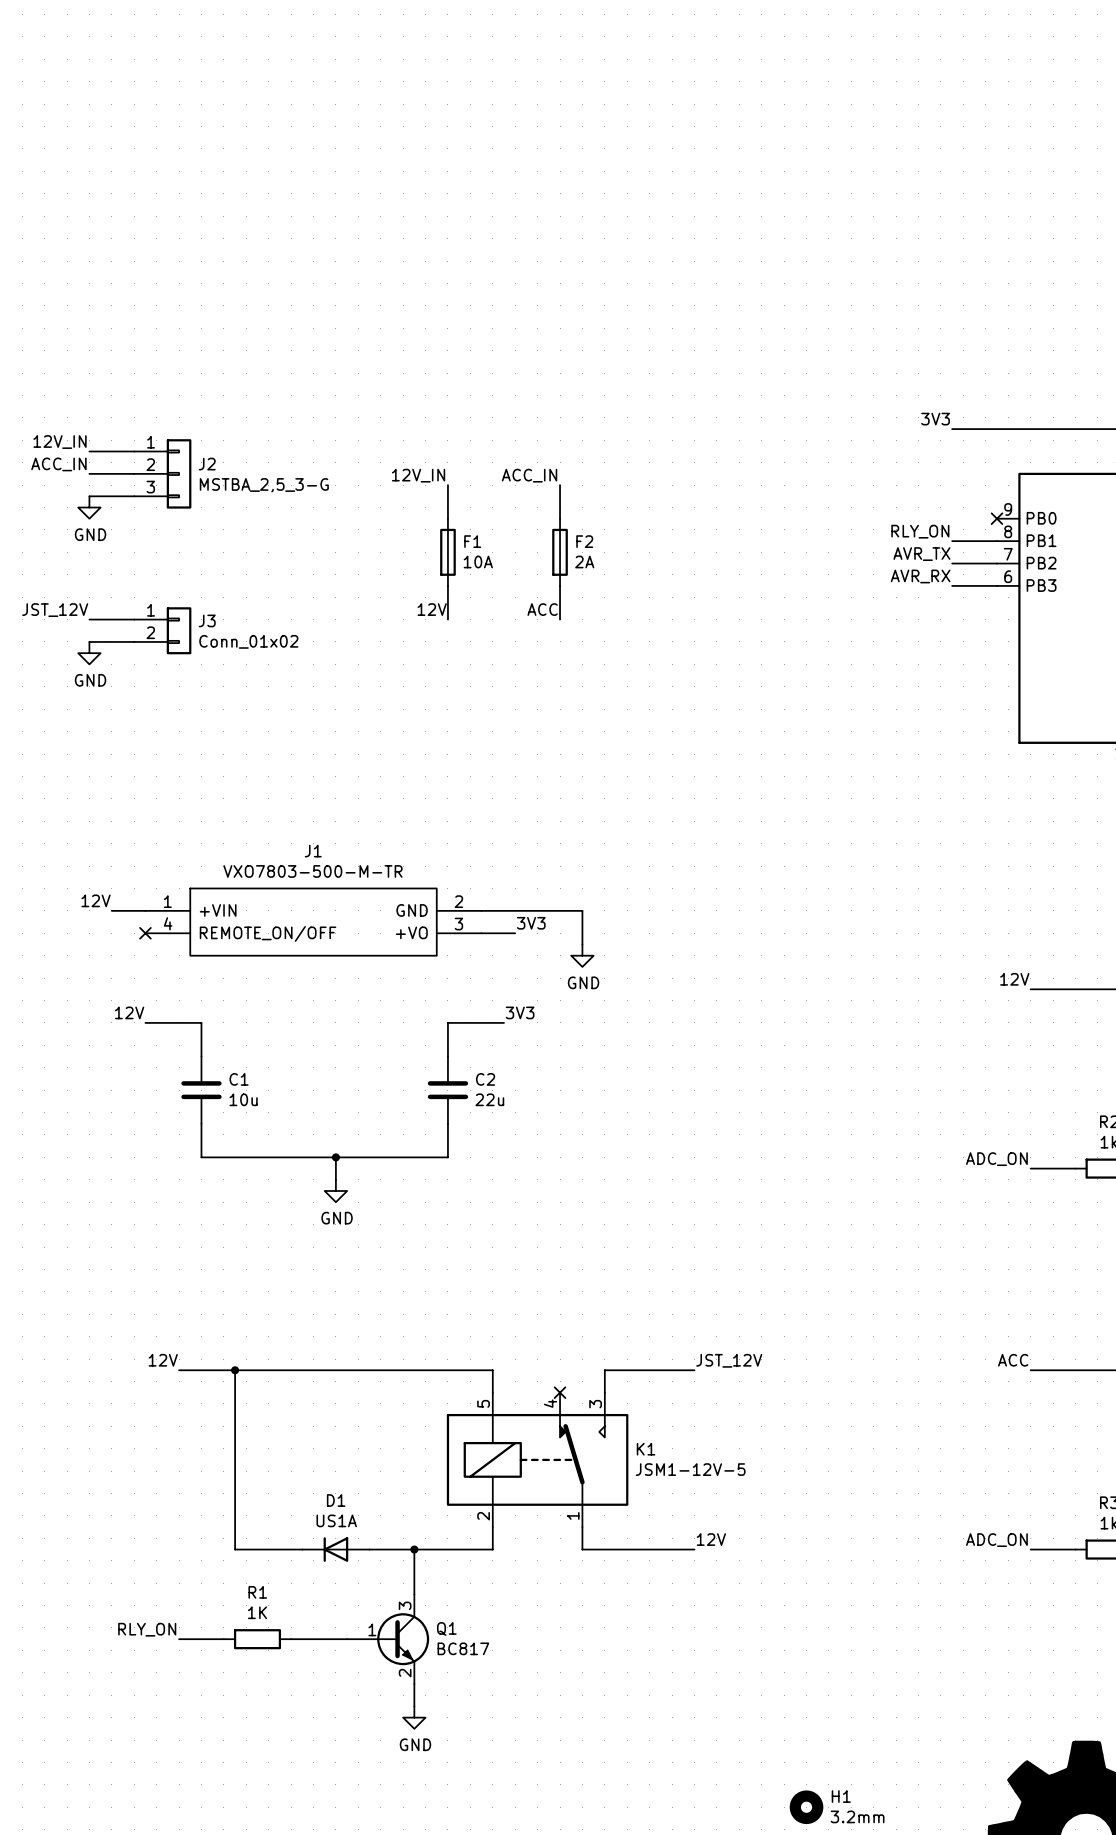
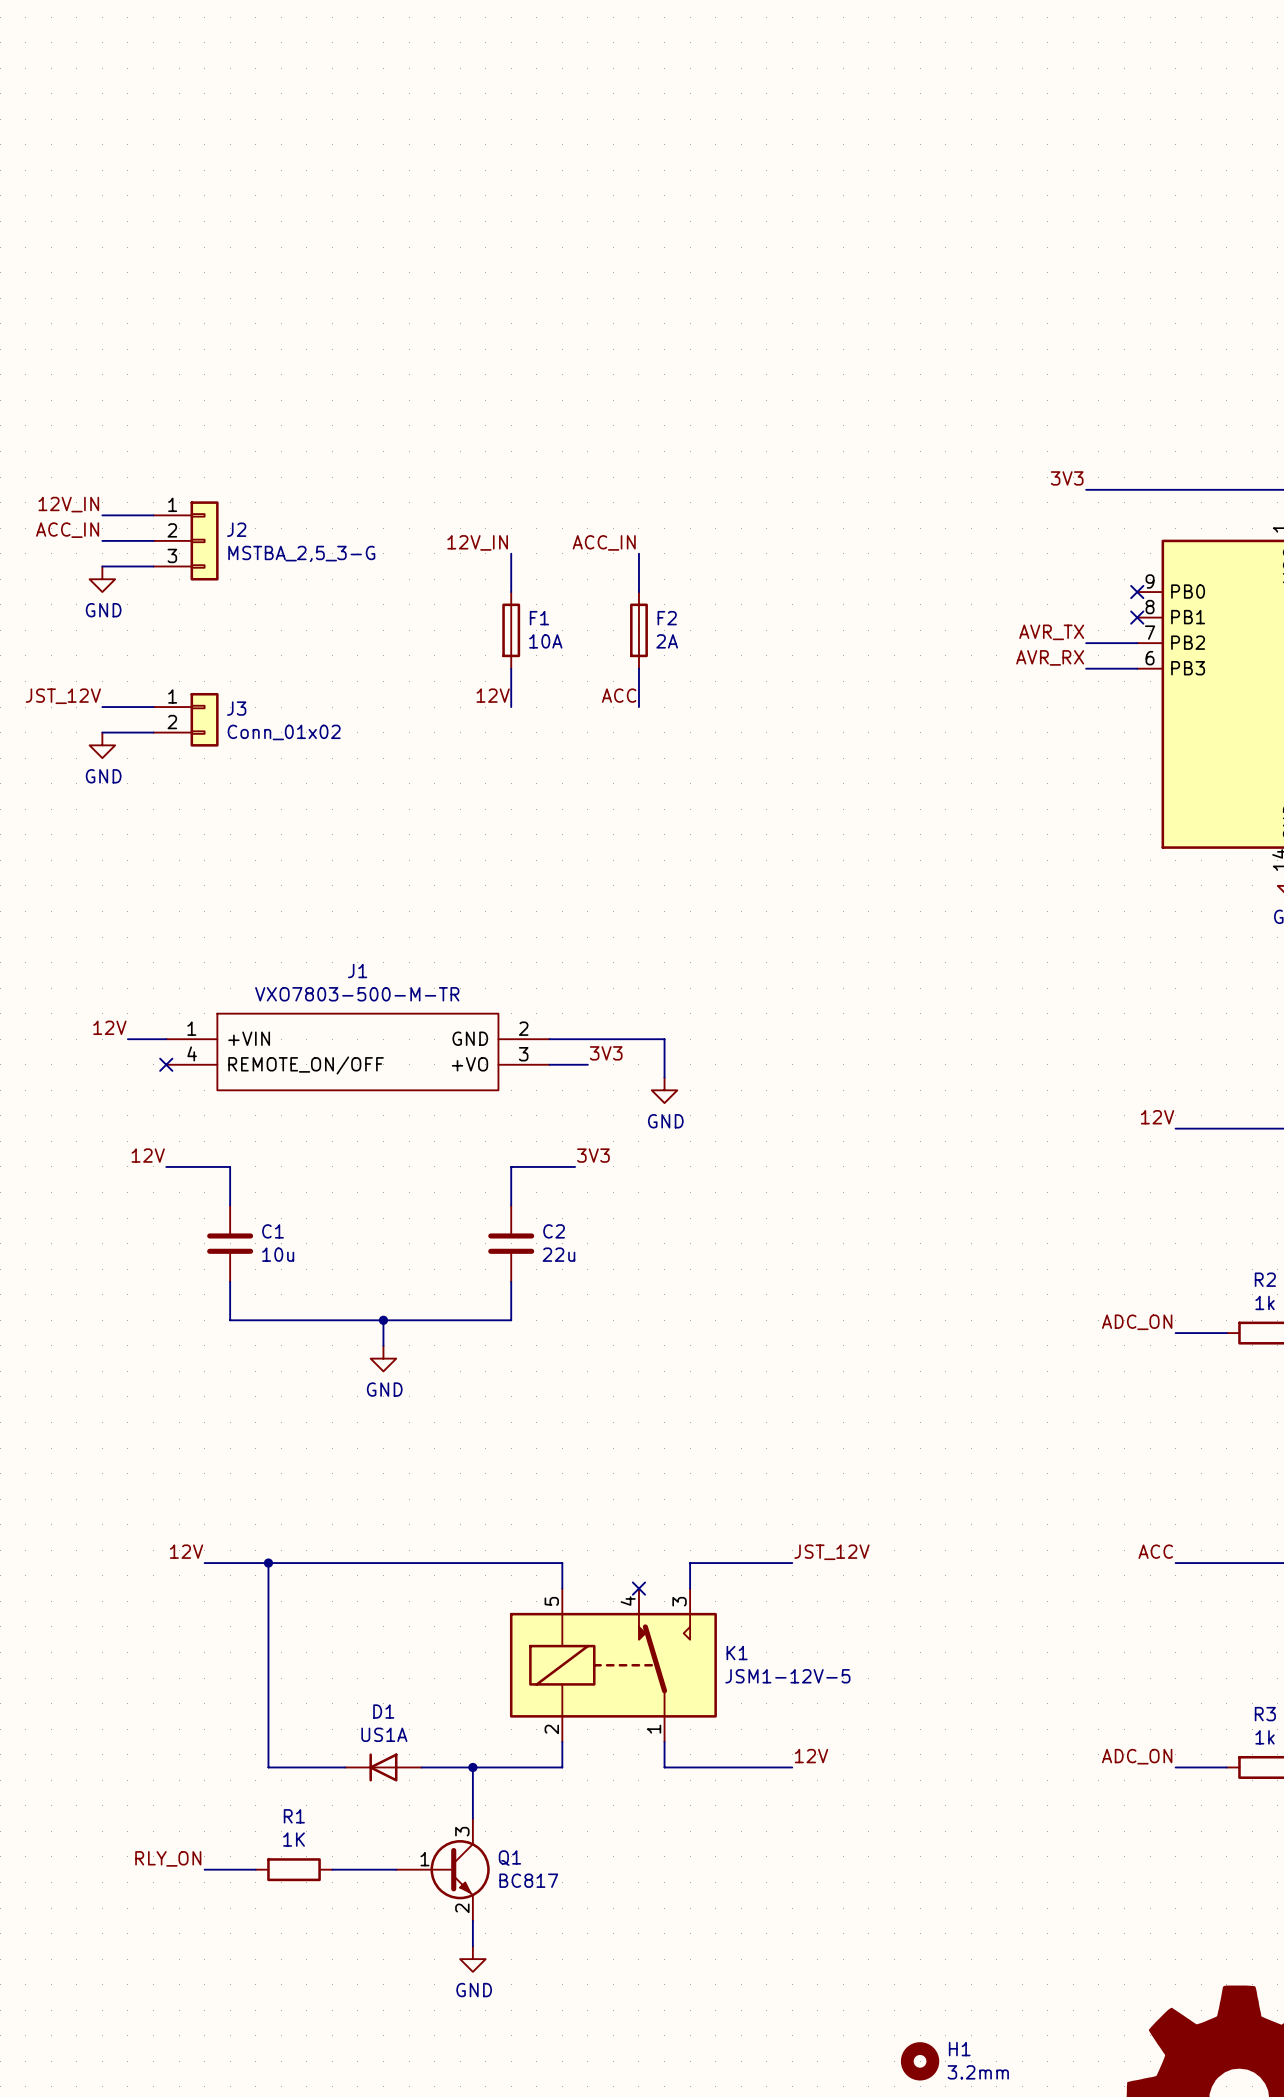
label: RLY_ON (920, 531) -> none
wire: (952, 541) (997, 541) -> none
no-connect mark: none -> (1137, 617)

